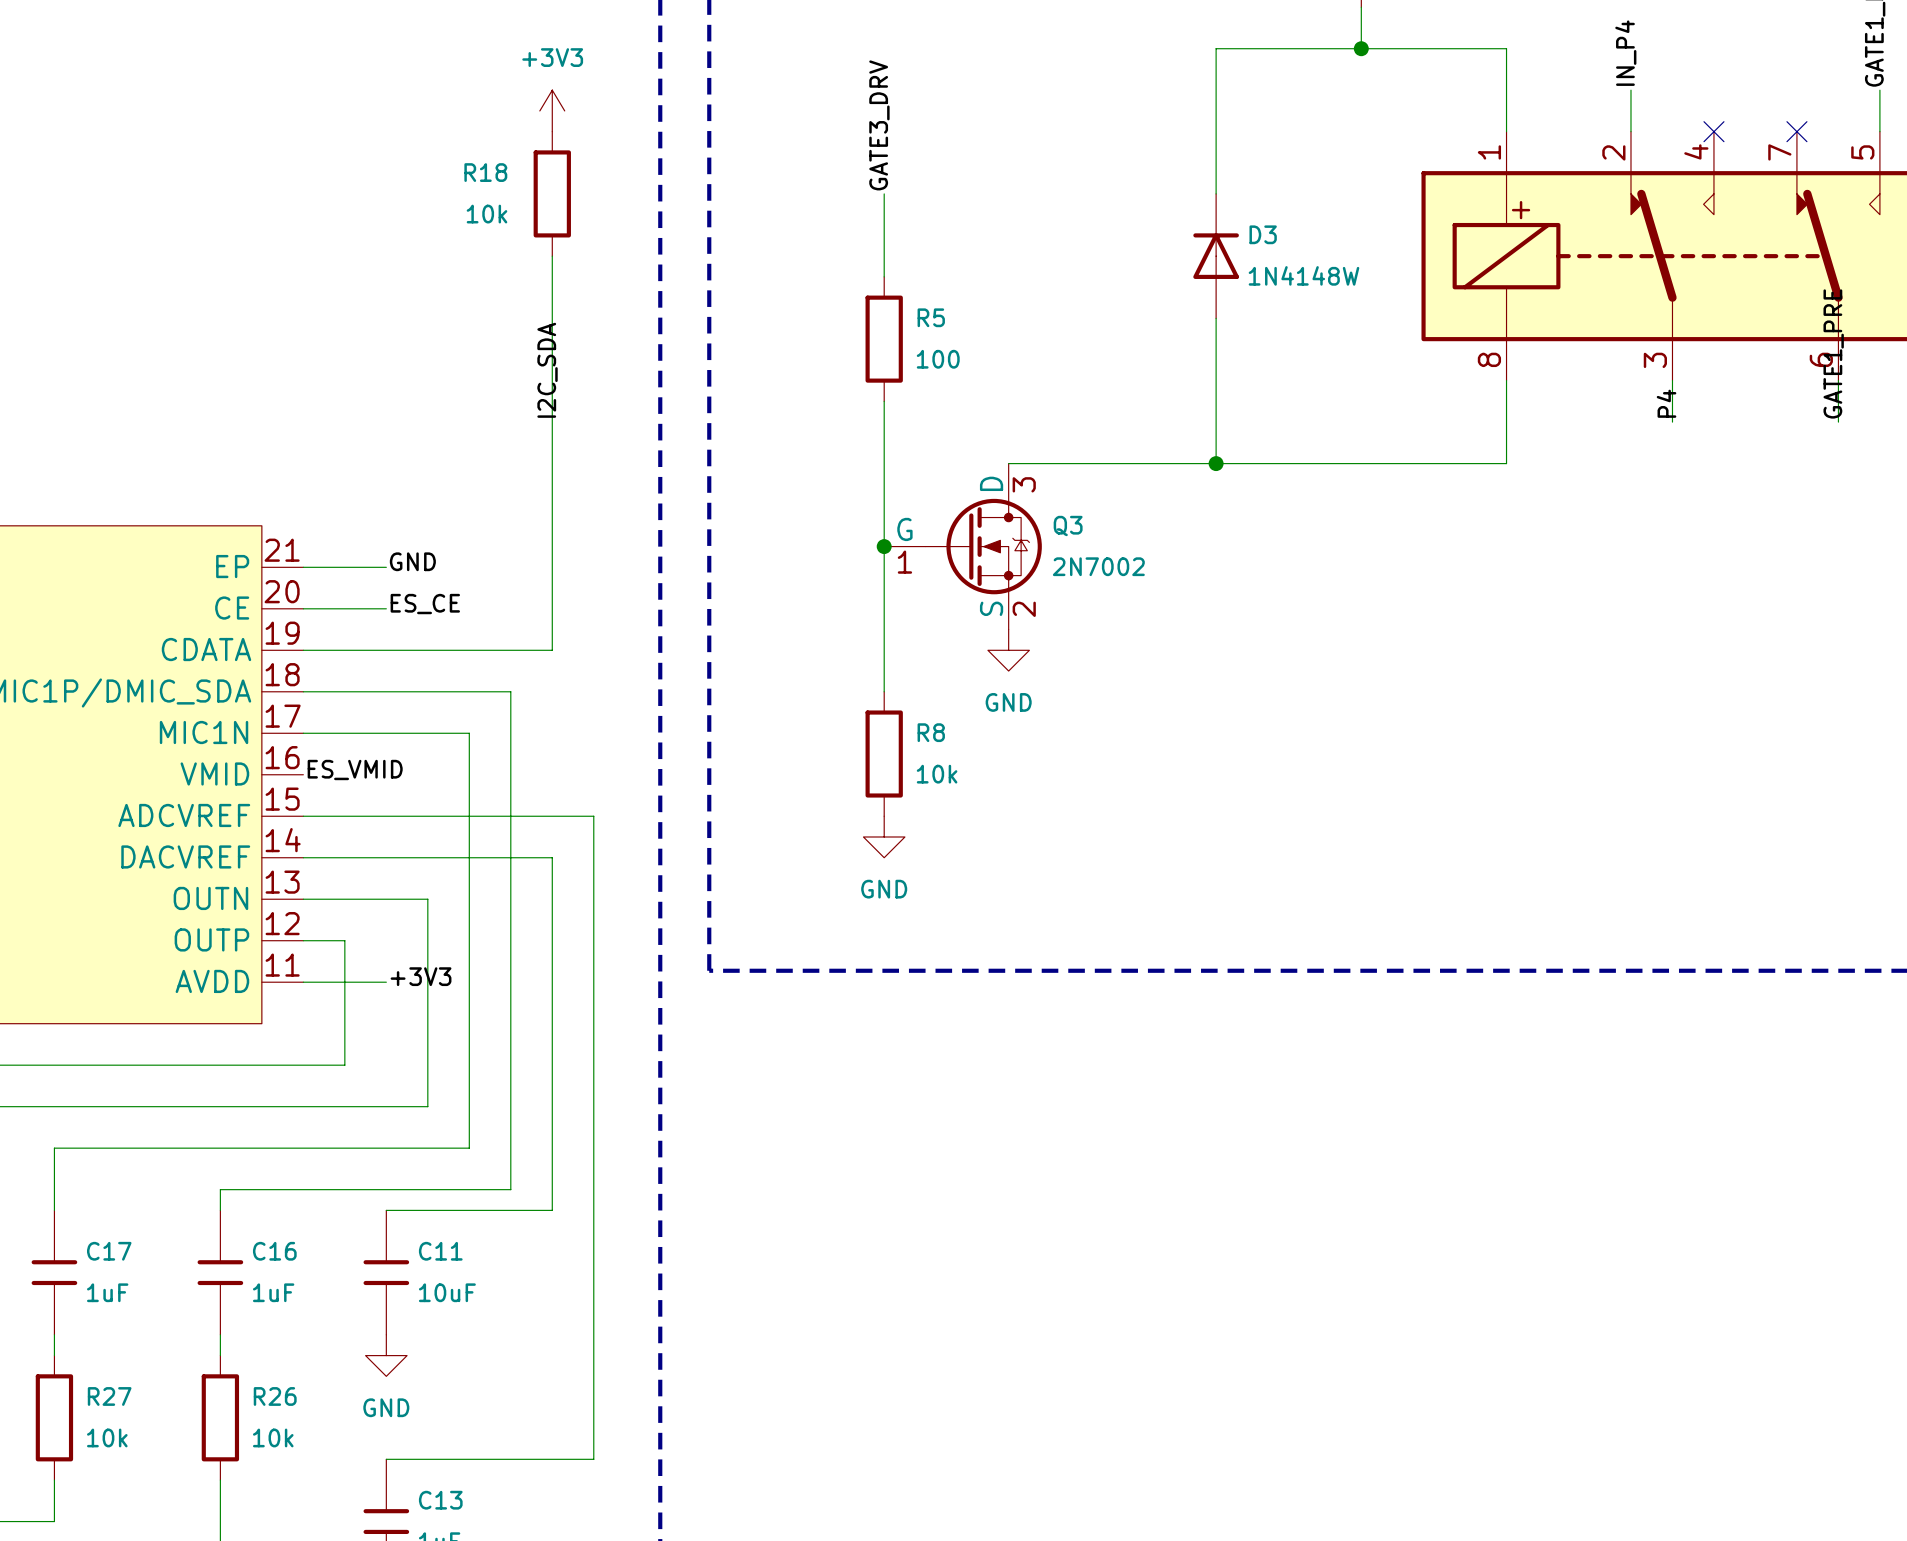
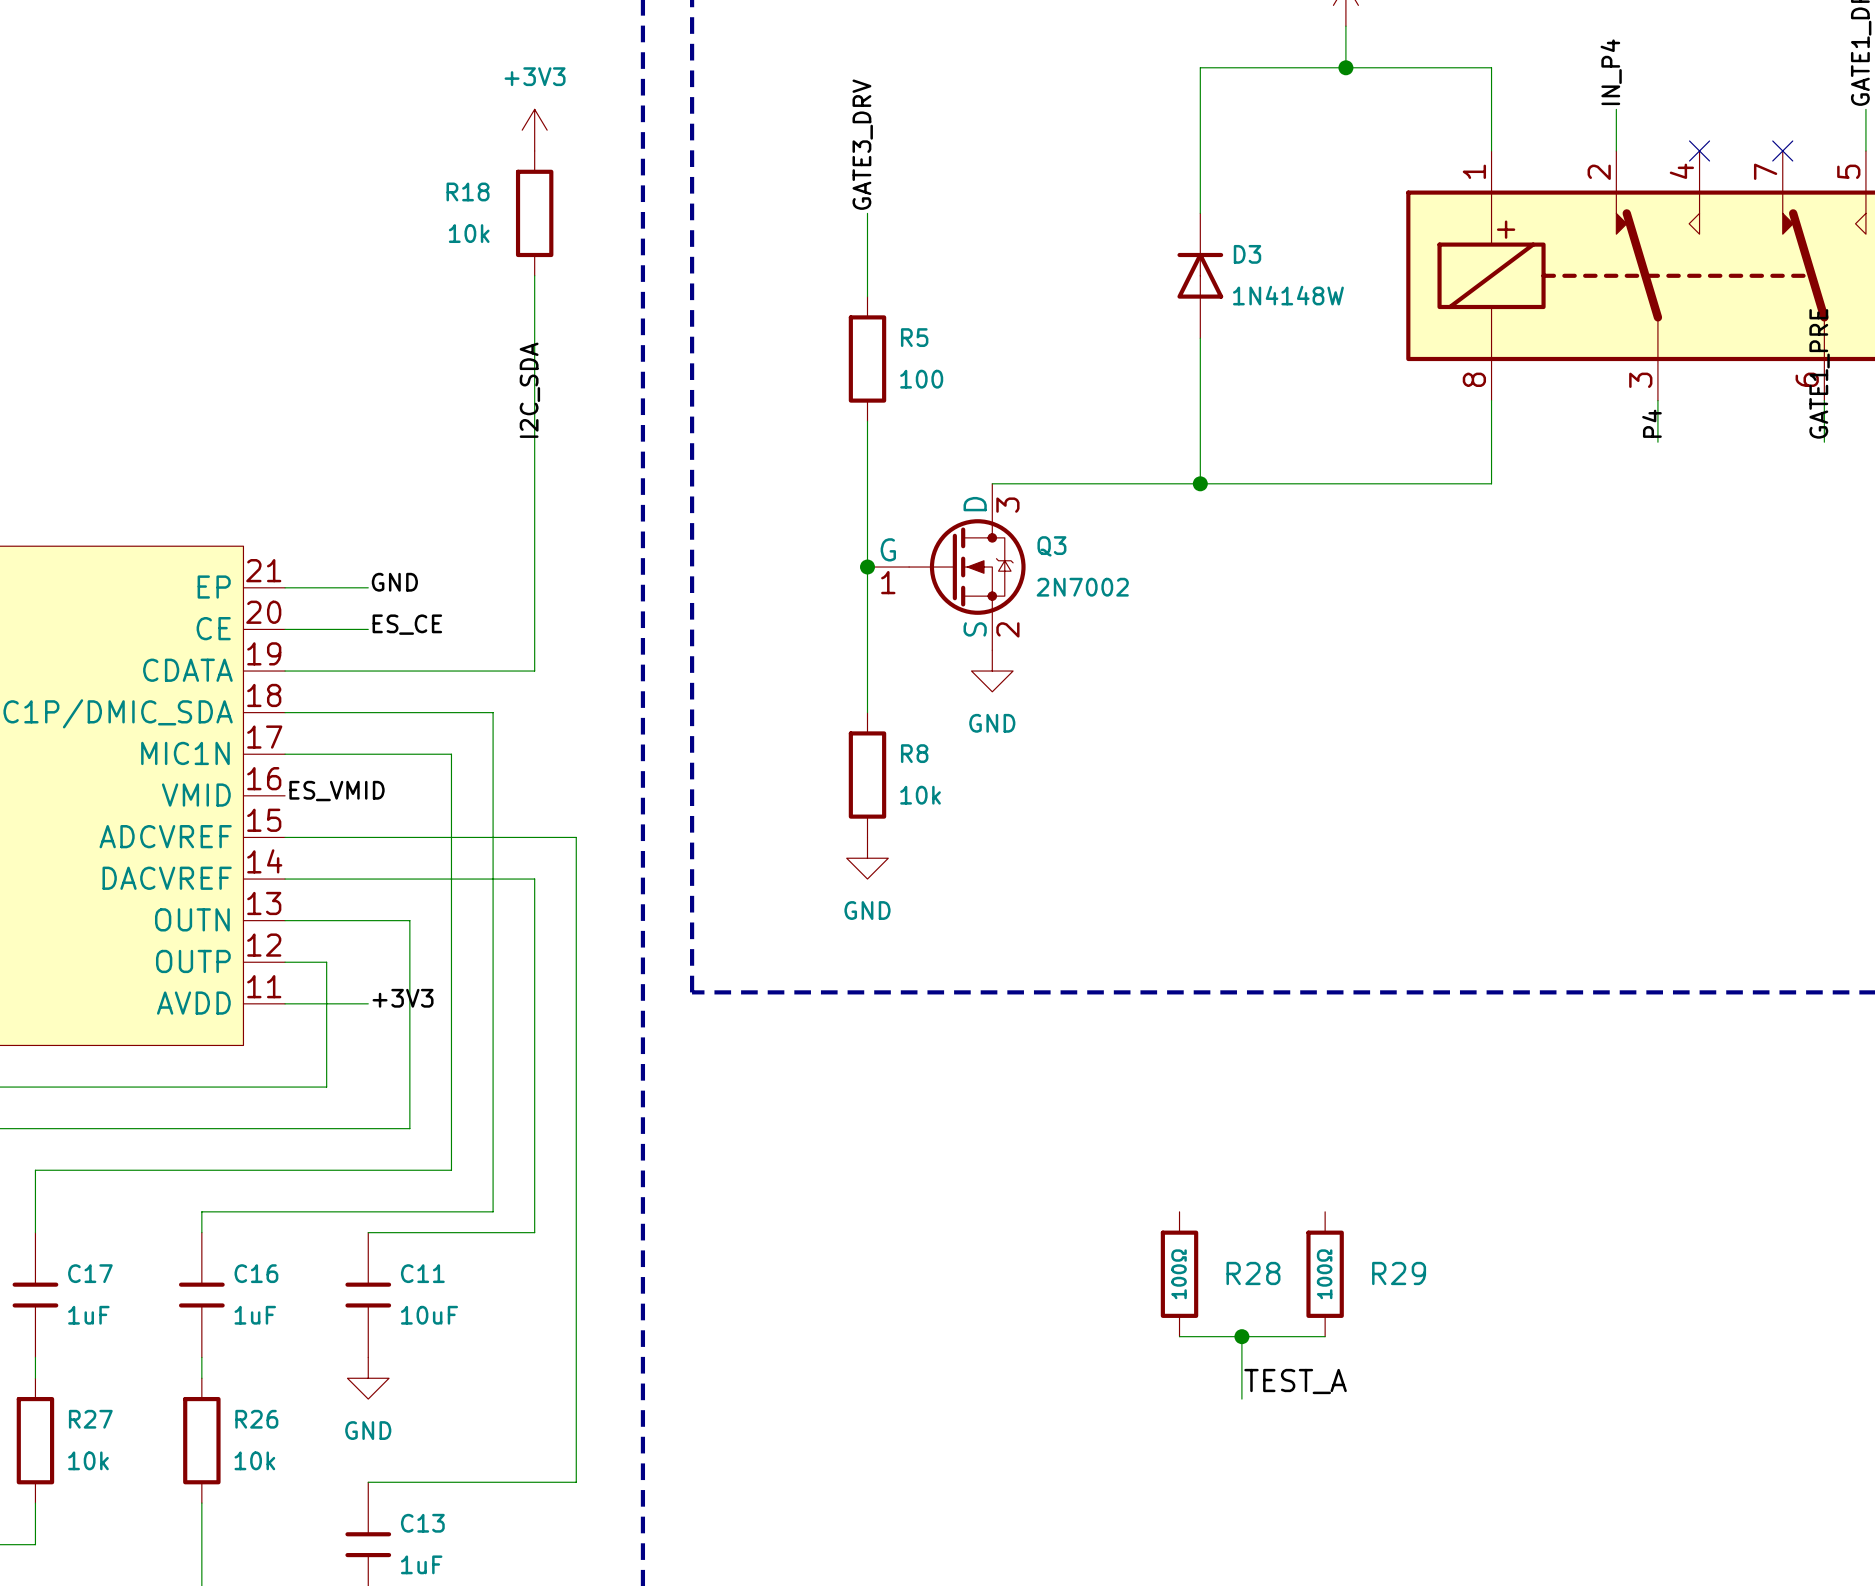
R28: none -> 100Ω (1179, 1274)
R29: none -> 100Ω (1325, 1274)
wire: none -> (1179, 1336) (1325, 1336)
wire: none -> (1241, 1336) (1241, 1399)
junction: none -> (1241, 1336)
label: none -> TEST_A (1295, 1381)

